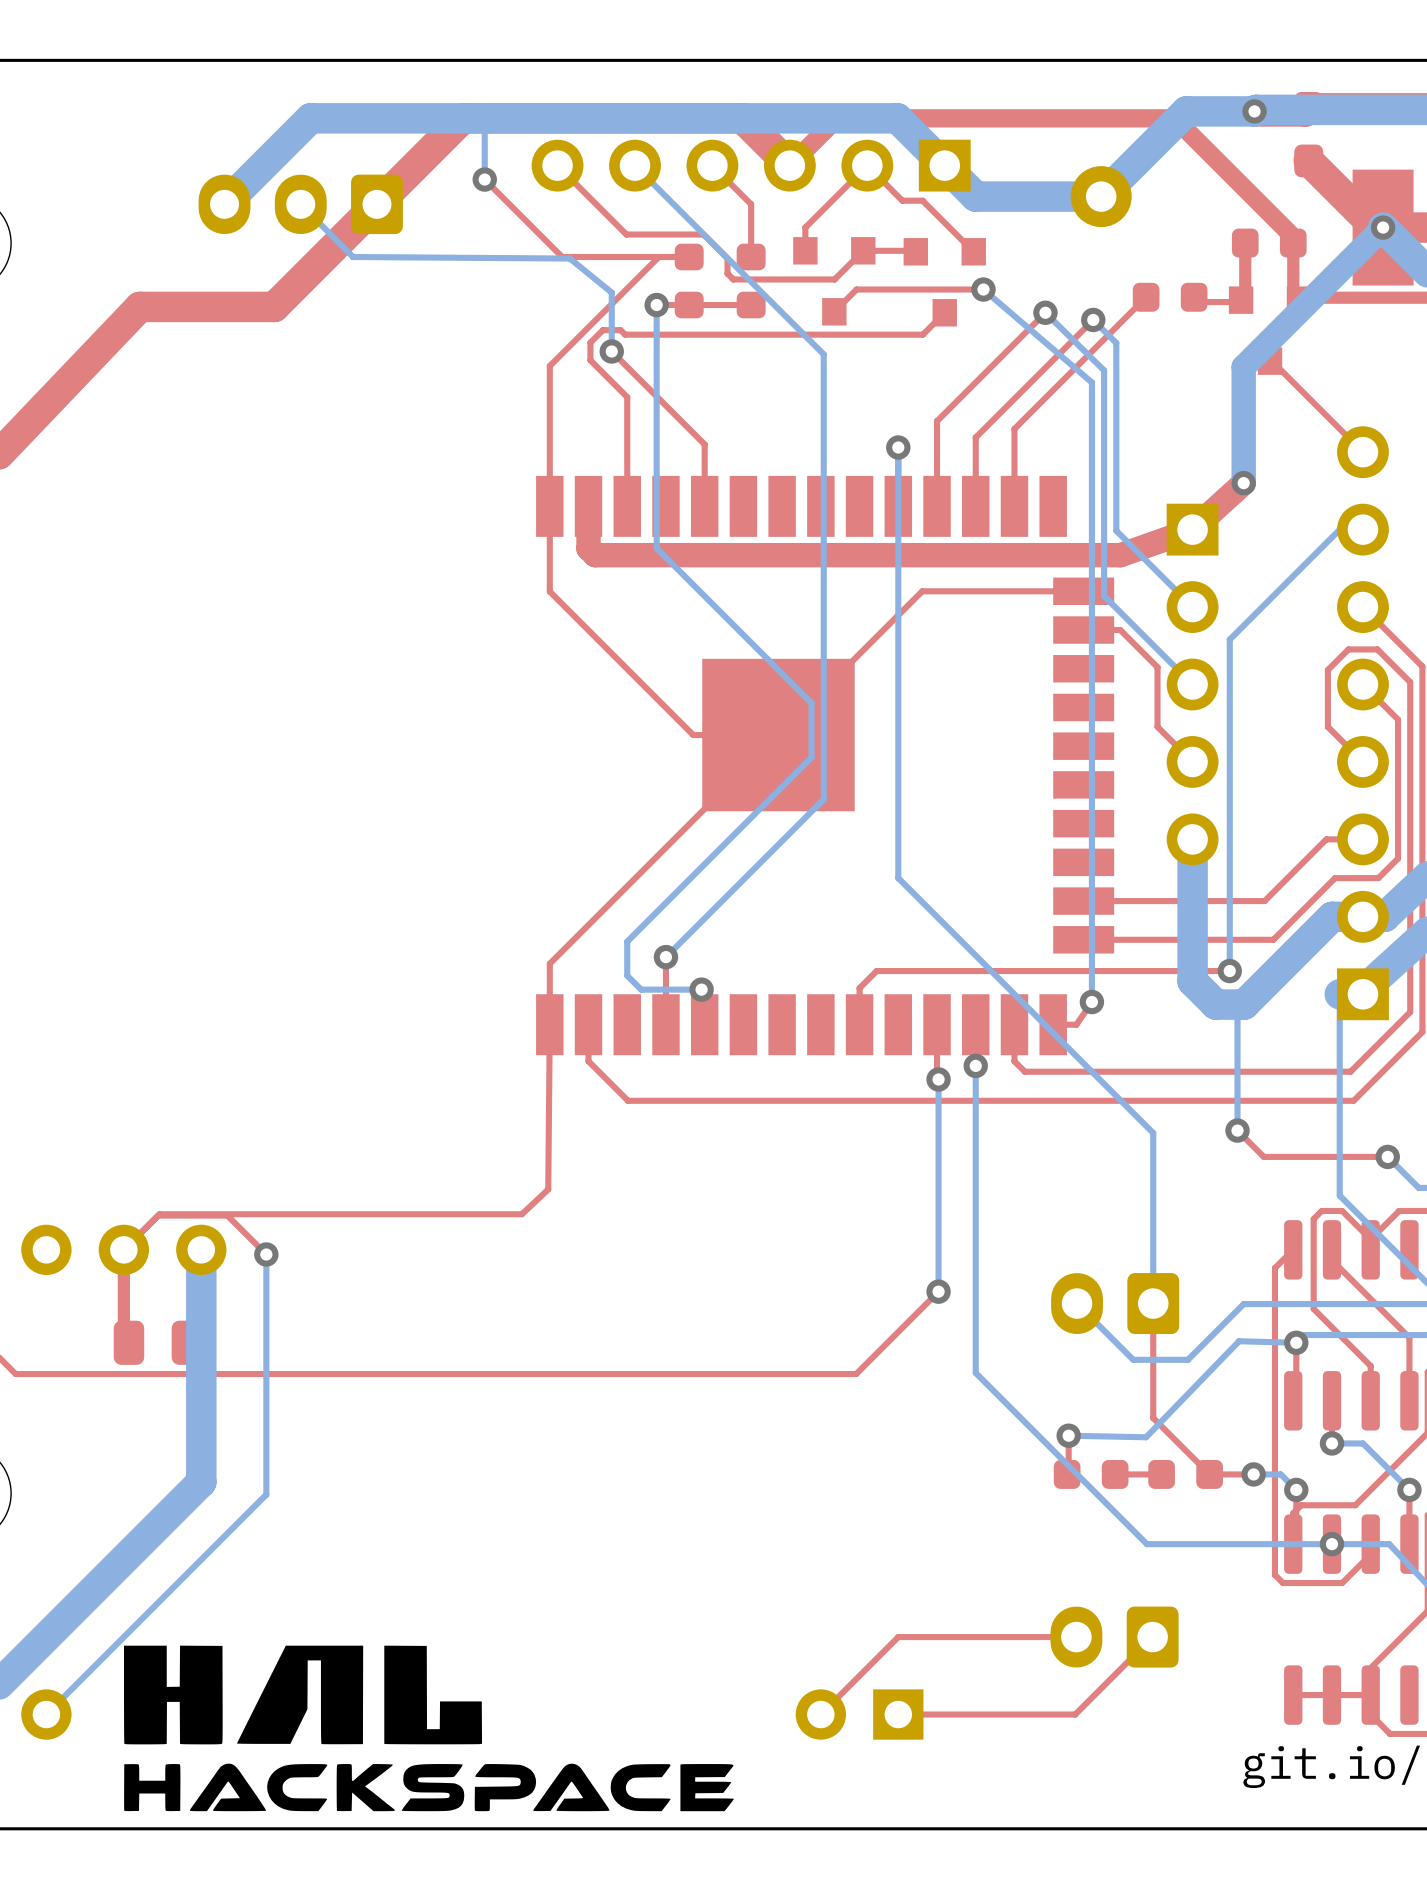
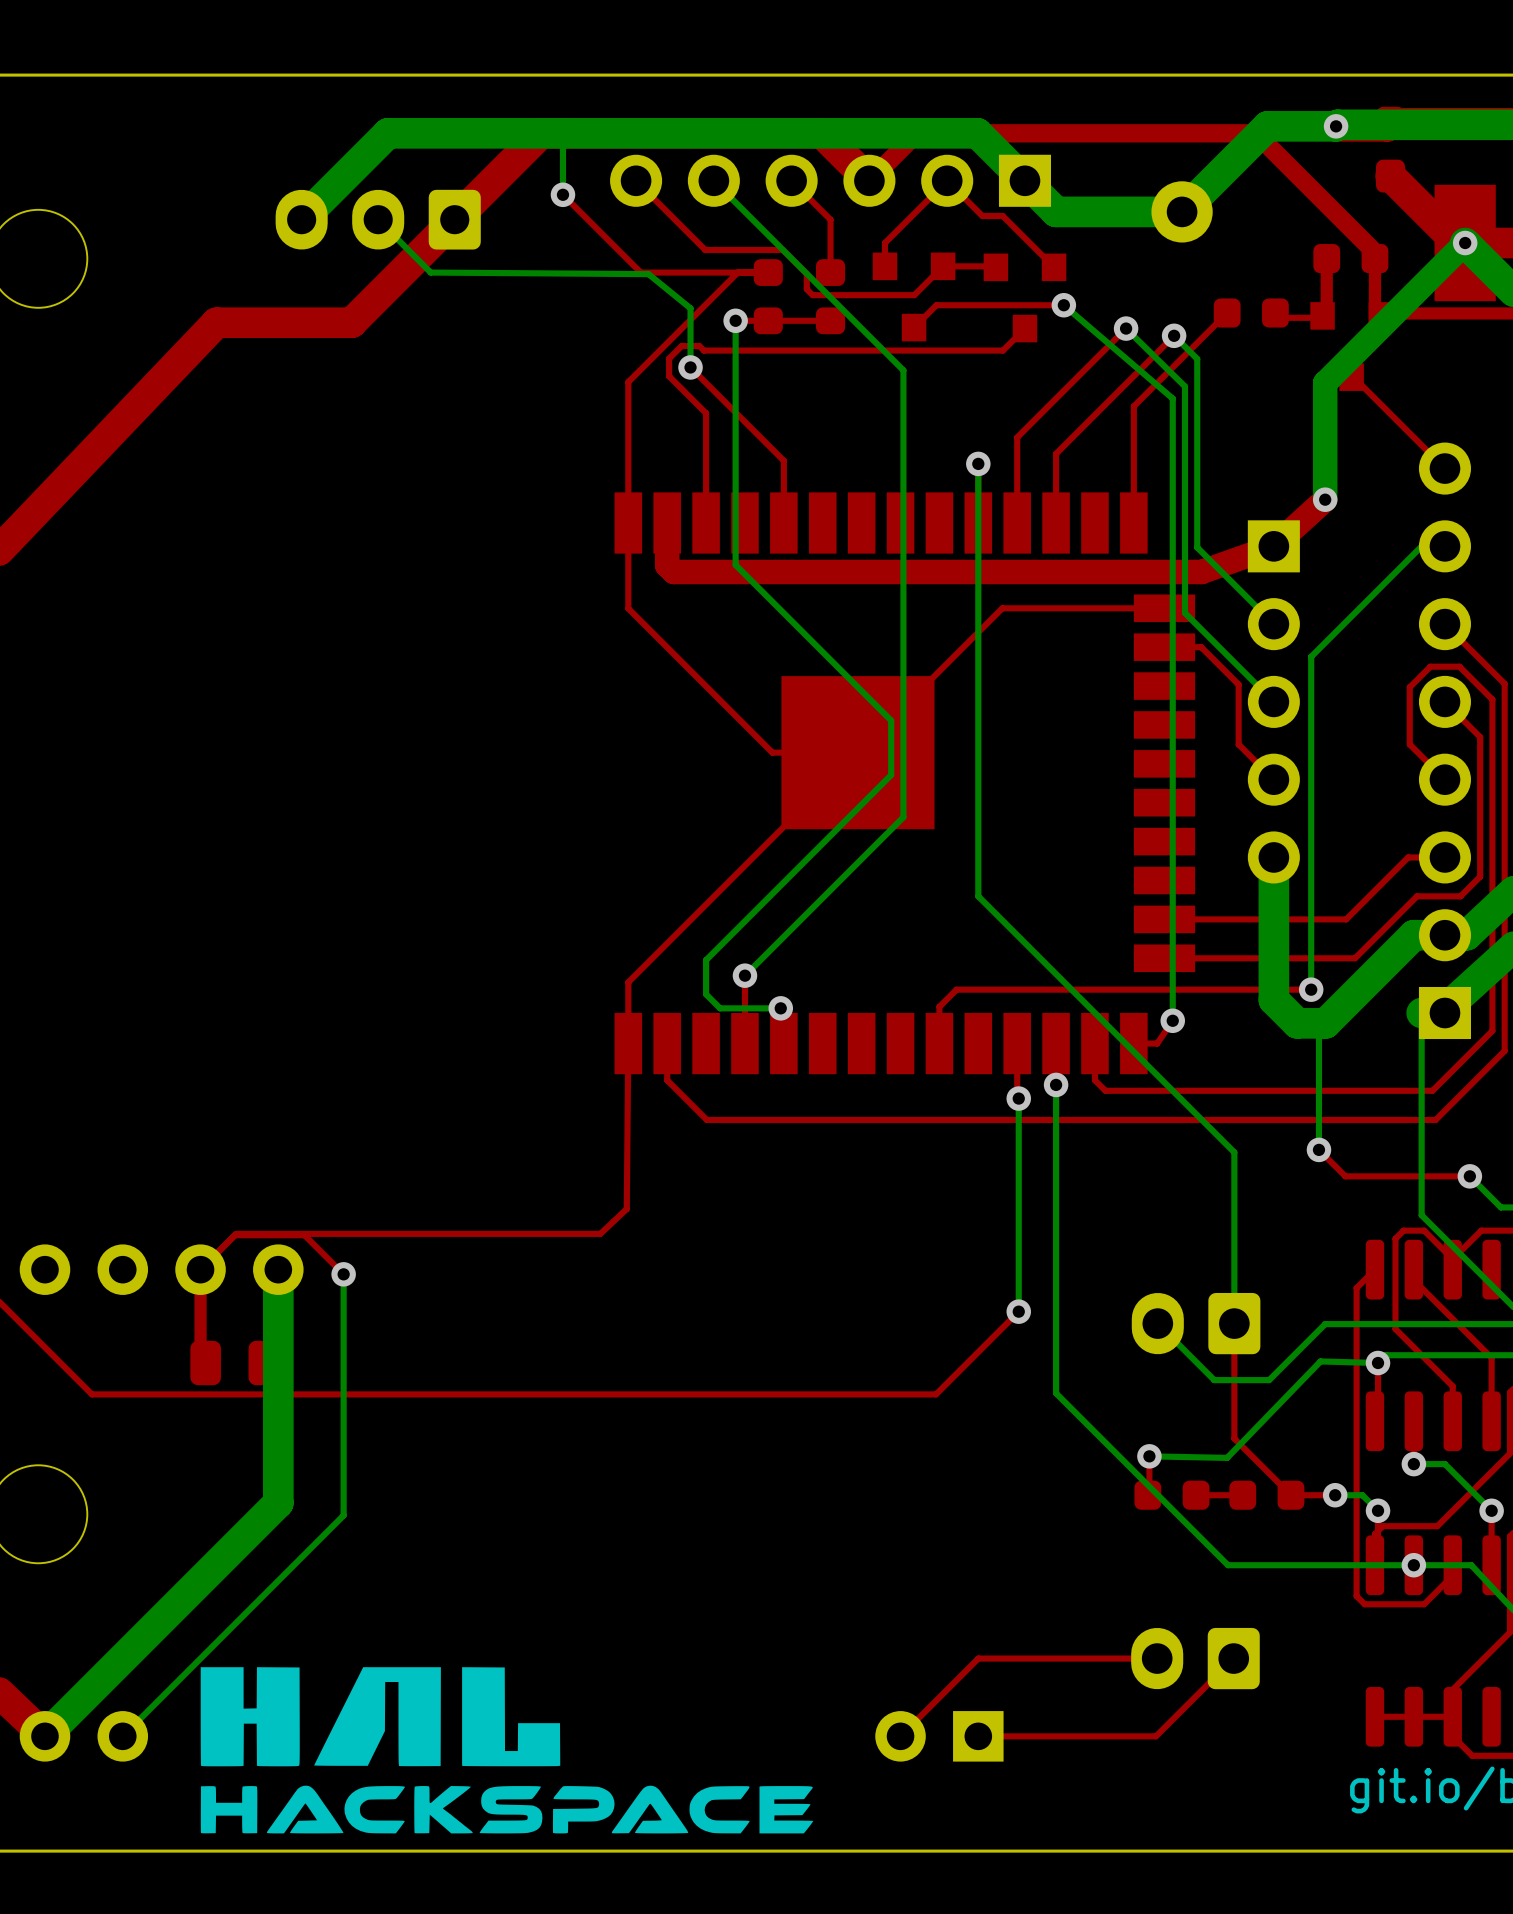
top track: (1053, 390) (1014, 428) (1014, 506) -> (1133, 406) (1133, 523)

